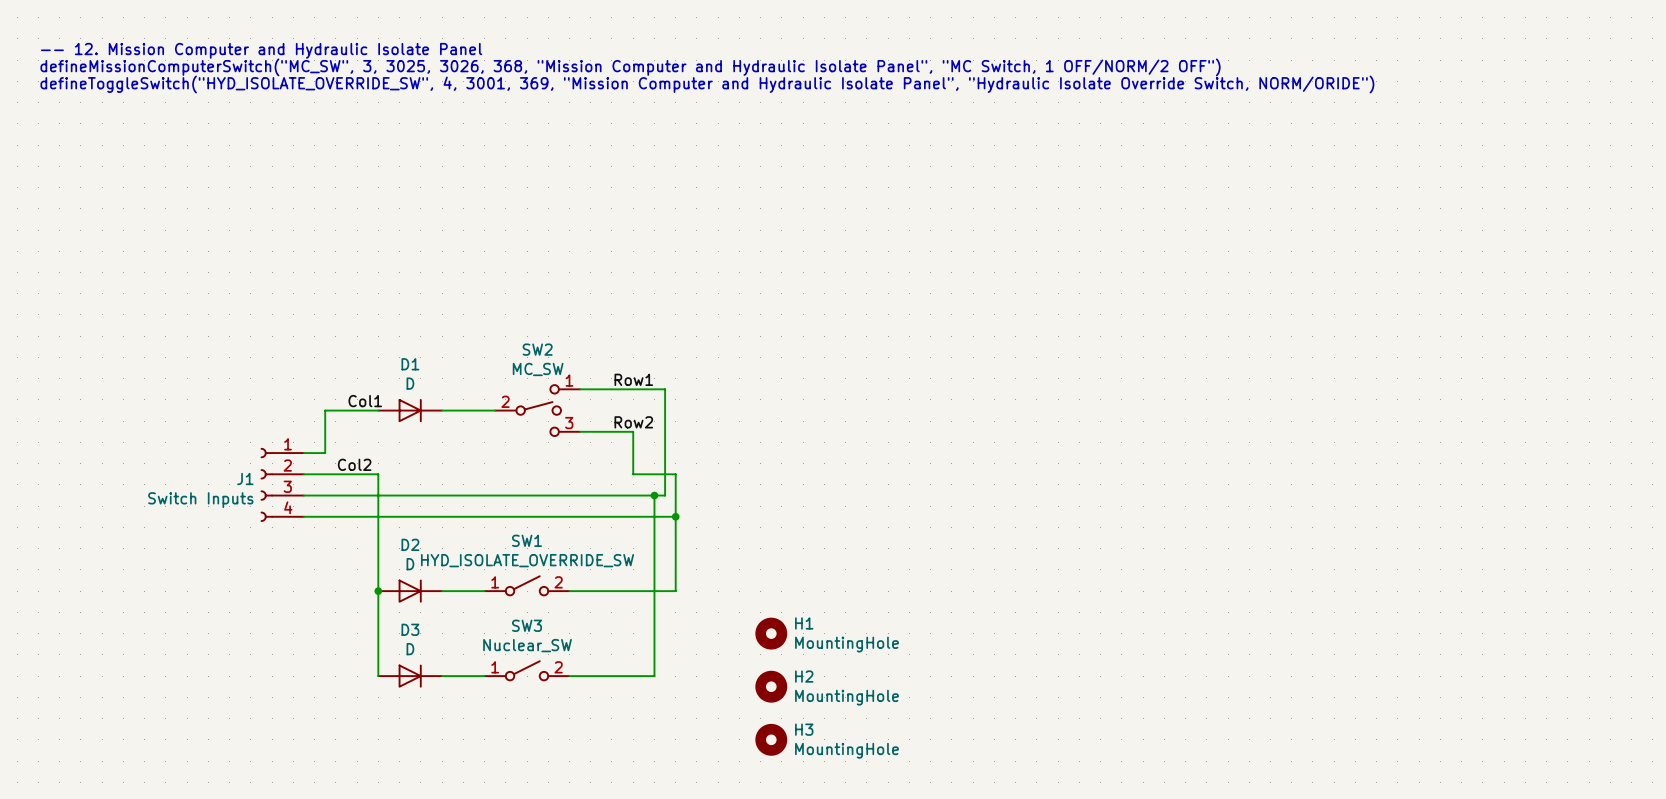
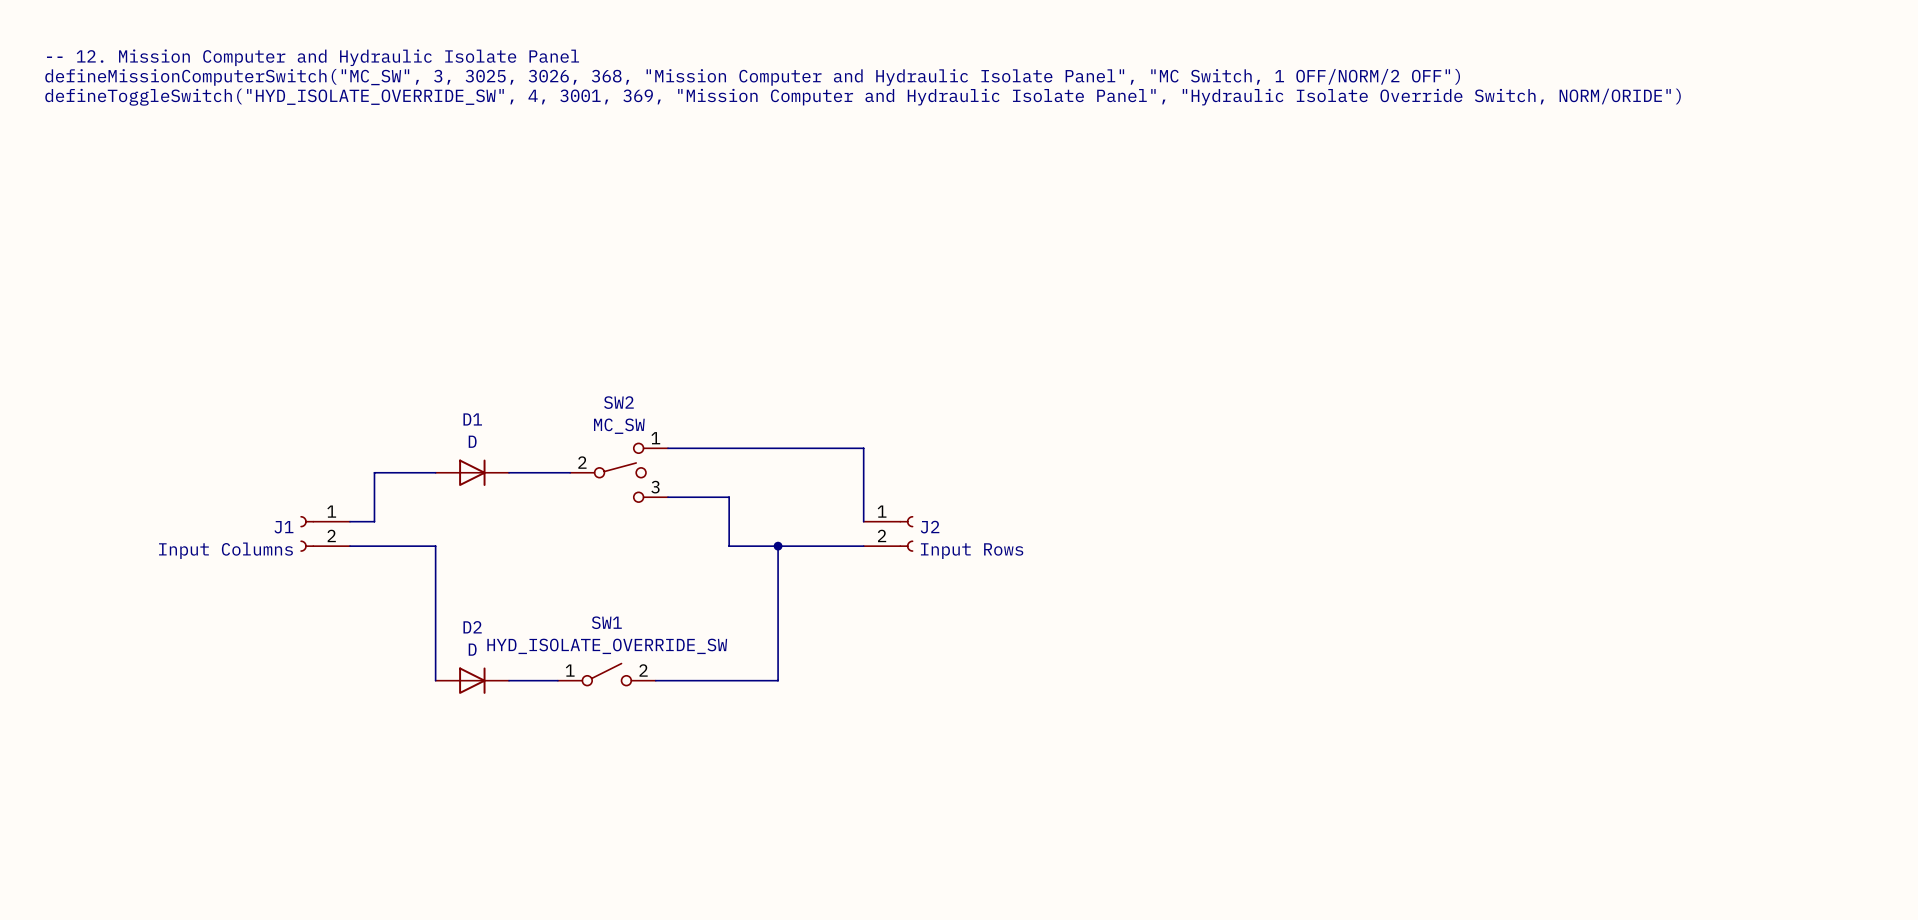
label: Row1 (633, 379) -> none
wire: (665, 389) (665, 495) (303, 495) -> (765, 448) (863, 448) (863, 521)
label: Col1 (365, 401) -> none
label: Row2 (633, 422) -> none
J1 symbol: [260, 448, 304, 522] -> [300, 516, 351, 552]
J2: none -> Input Rows (888, 533)
label: Col2 (354, 464) -> none
wire: none -> (778, 546) (863, 546)
junction: none -> (778, 546)
wire: (654, 495) (654, 676) (569, 676) -> none
junction: (654, 495) -> none
J1 value: Switch Inputs (200, 500) -> Input Columns (225, 550)
wire: (303, 516) (675, 516) -> none
junction: (675, 516) -> none
wire: (378, 591) (378, 676) -> none
junction: (378, 591) -> none
H1: MountingHole (771, 633) -> none
SW3: Nuclear_SW (527, 670) -> none
D3: D (410, 676) -> none
wire: (442, 676) (484, 676) -> none
H2: MountingHole (771, 686) -> none
H3: MountingHole (771, 739) -> none

